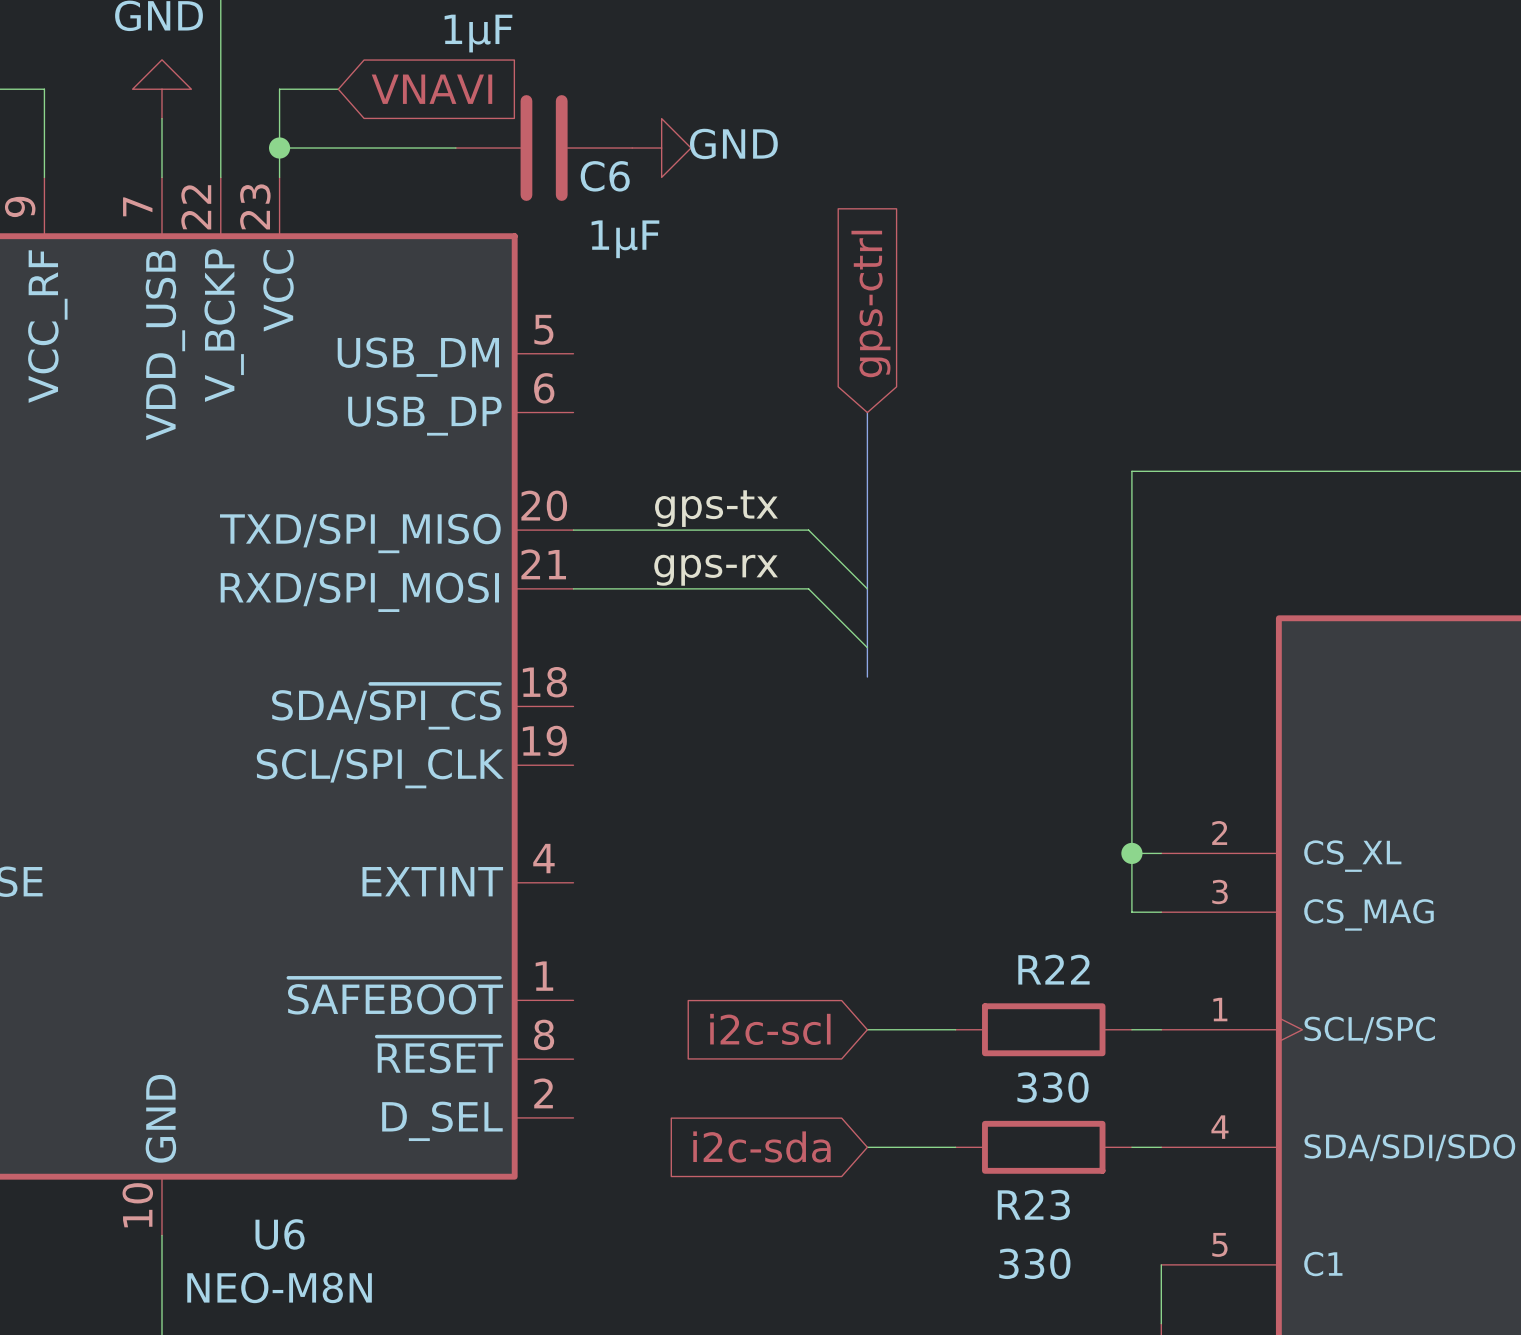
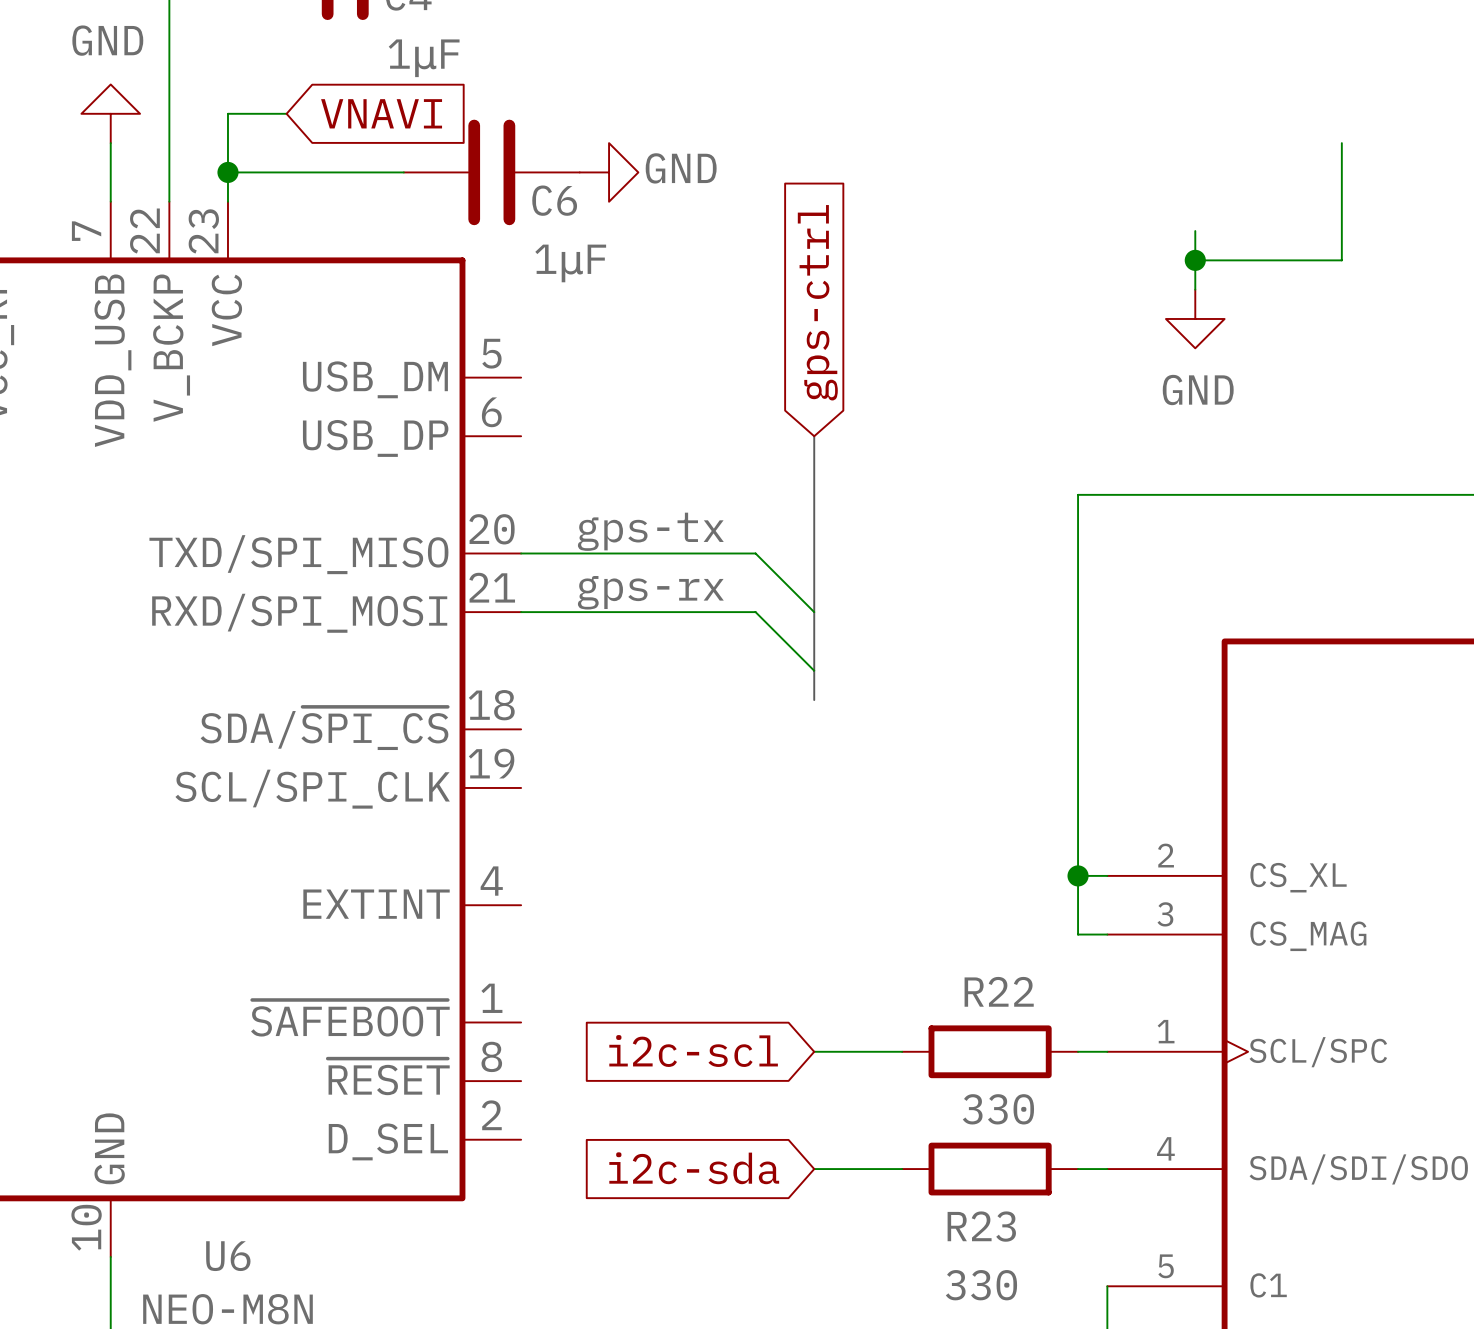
wire: none -> (1341, 143) (1341, 260) (1195, 260)
wire: none -> (1195, 231) (1195, 289)
junction: none -> (1195, 260)
power symbol: none -> GND (1195, 318)

